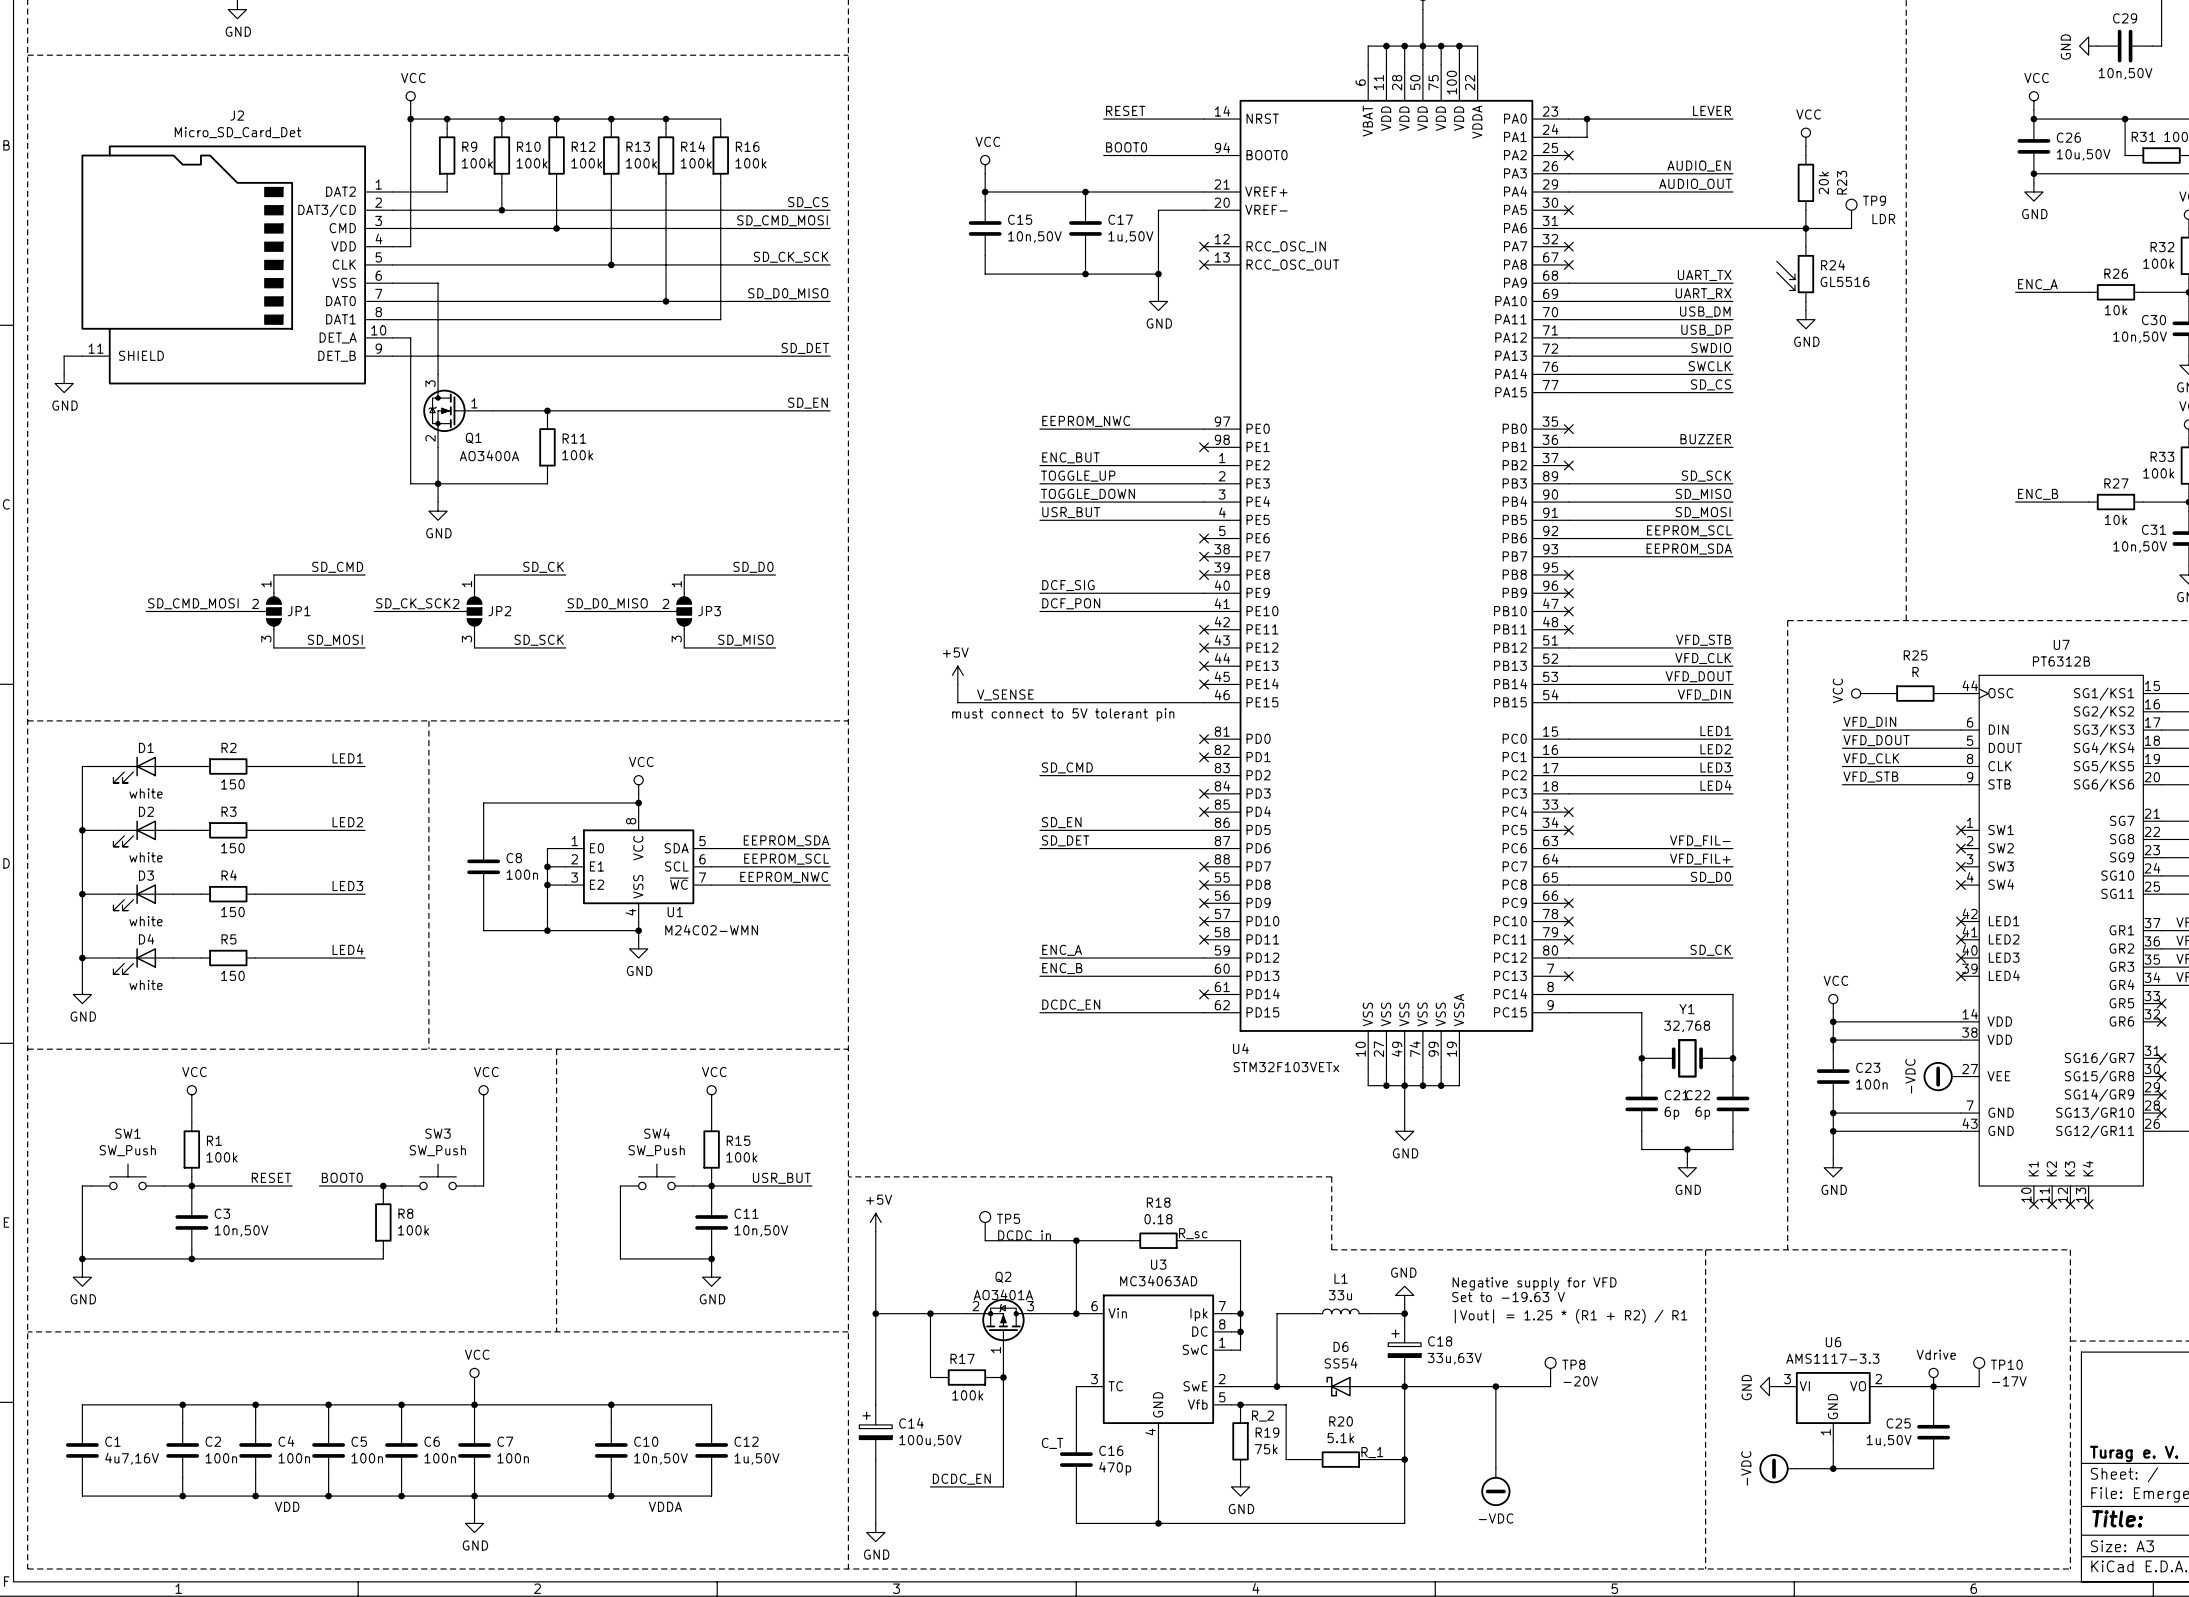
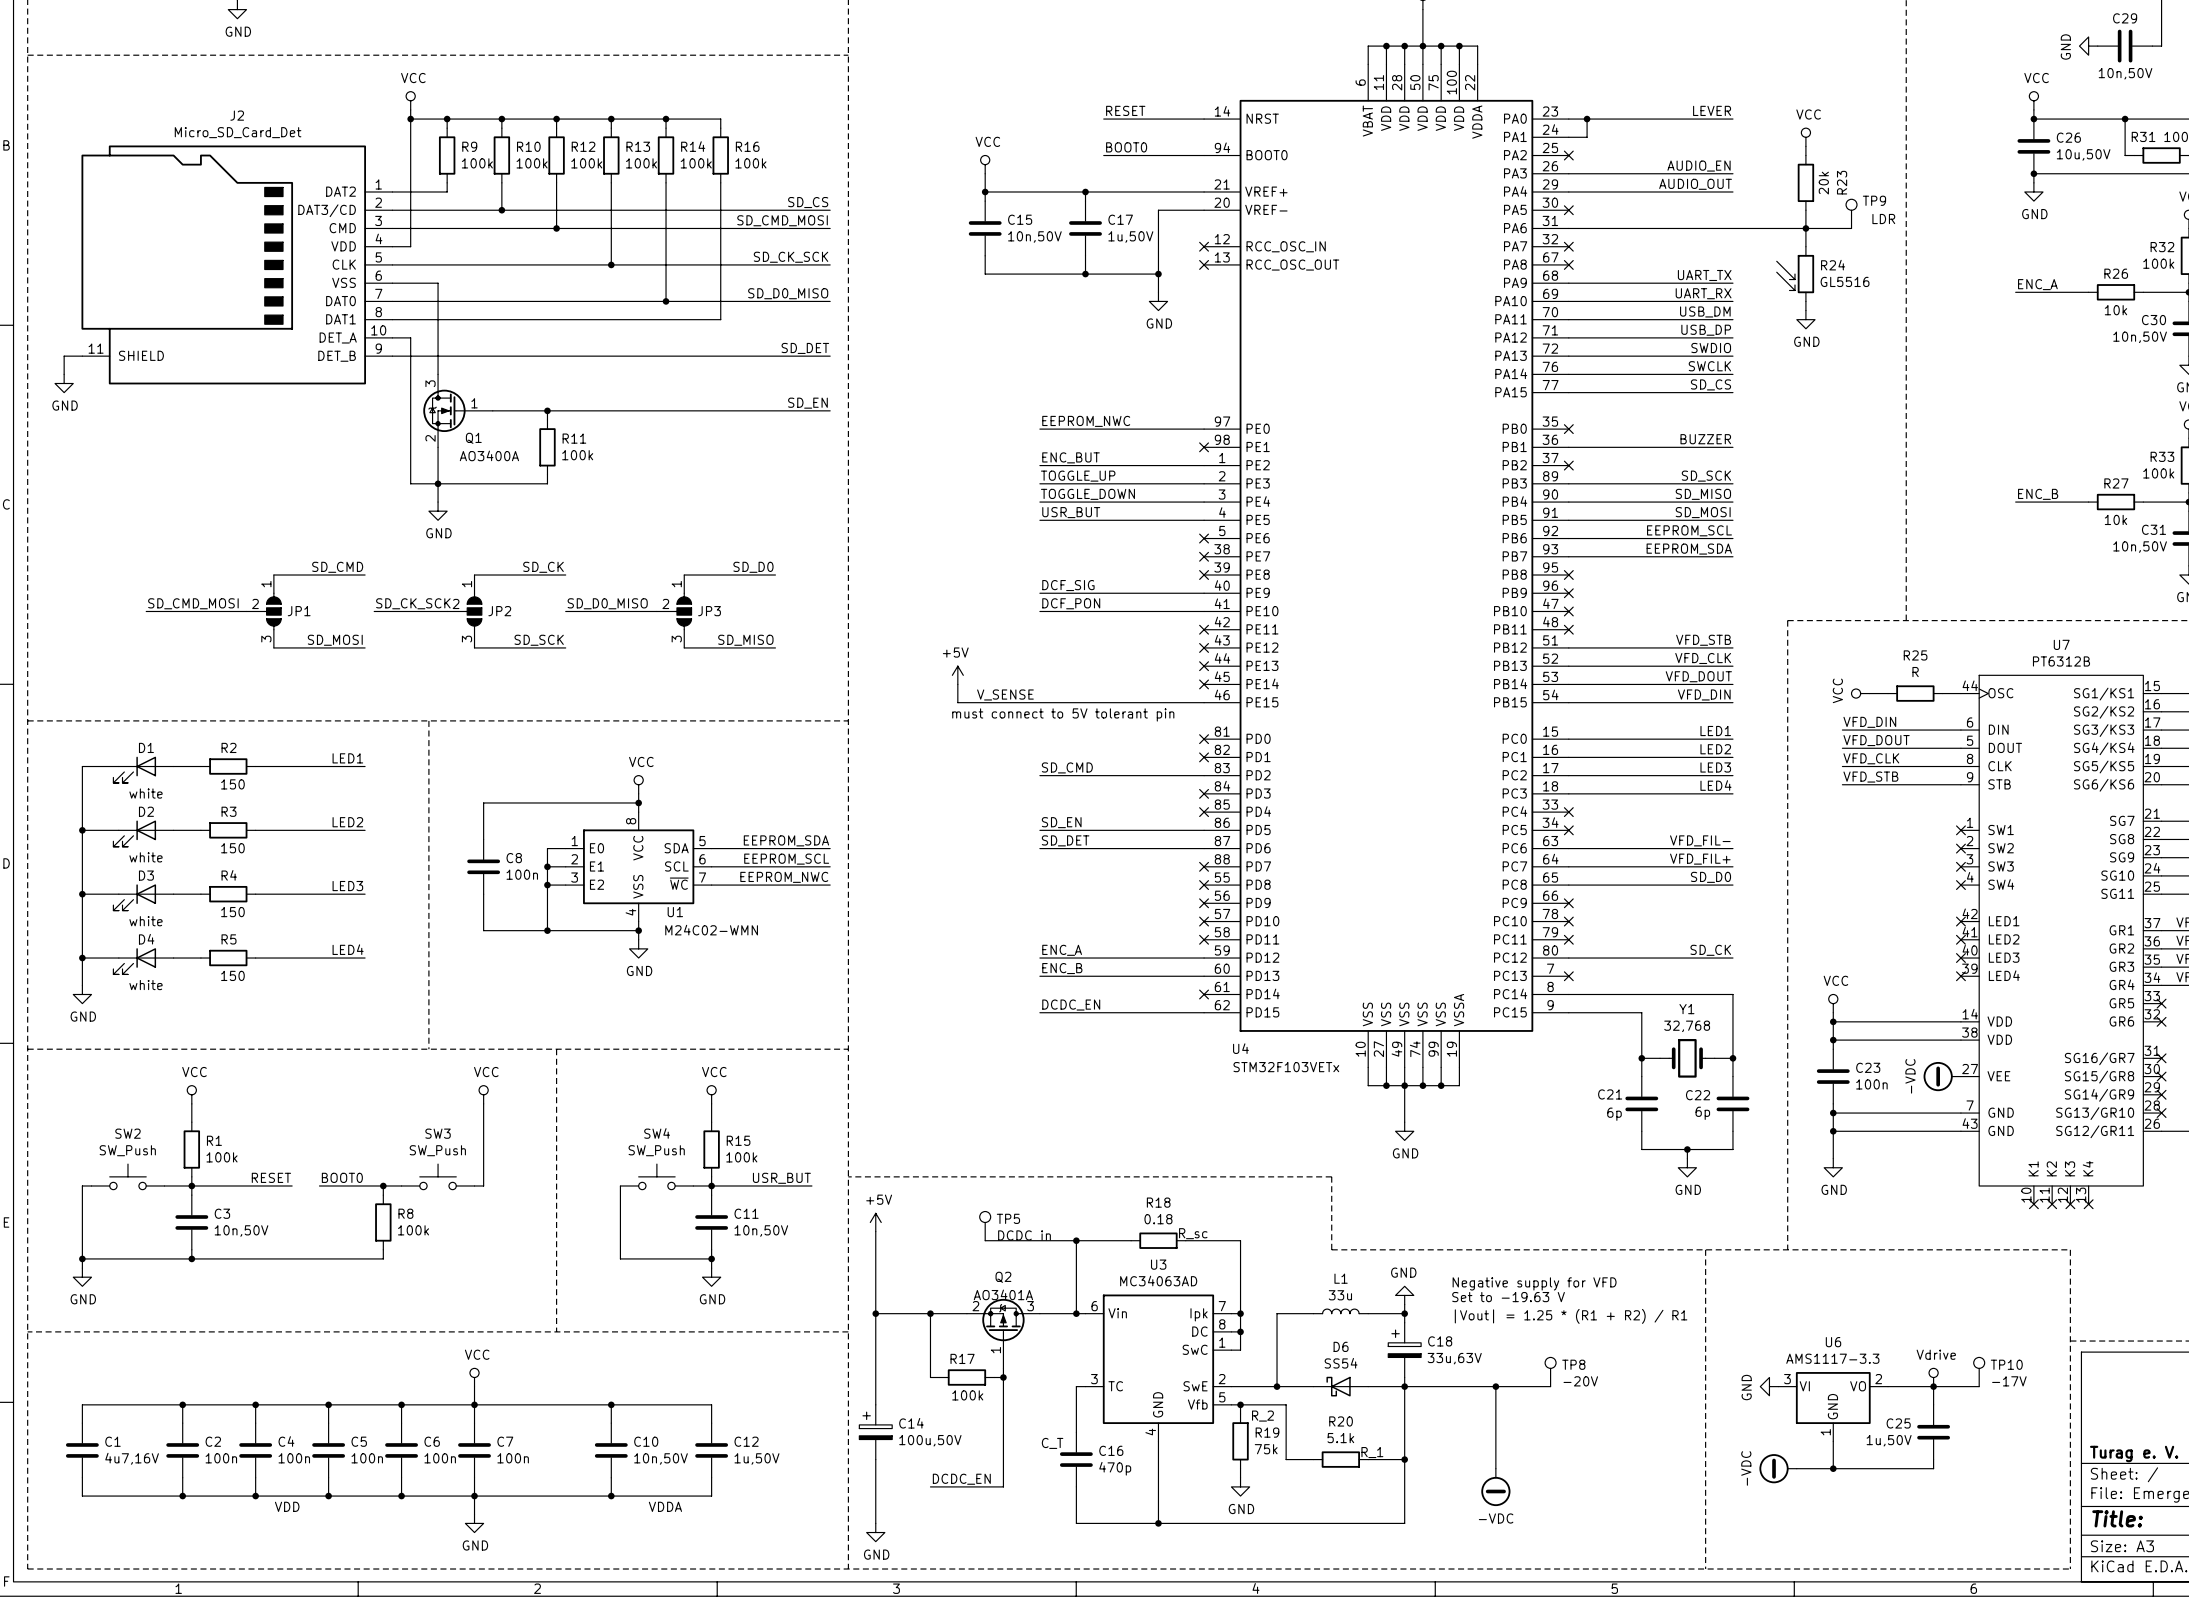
C21 name position: C21 (1676, 1095) -> C21 (1610, 1094)
C21 value position: 6p (1671, 1113) -> 6p (1614, 1114)
SW1 name: SW1 (127, 1133) -> SW2 (127, 1133)

